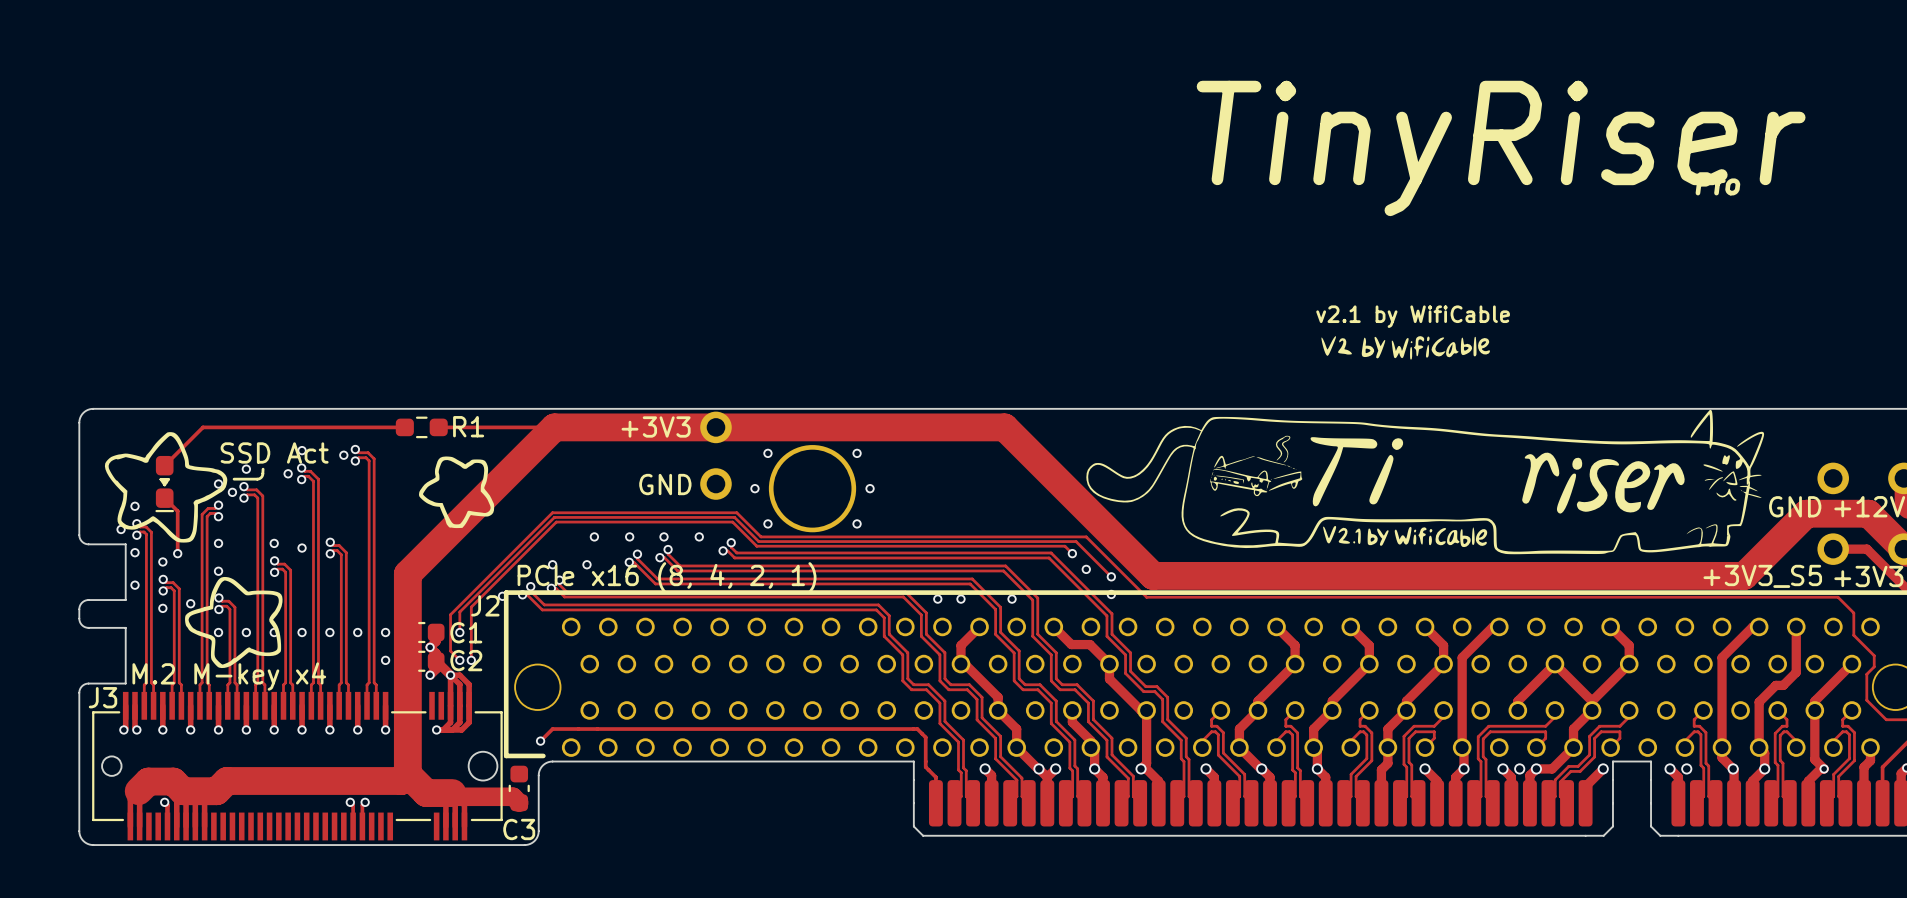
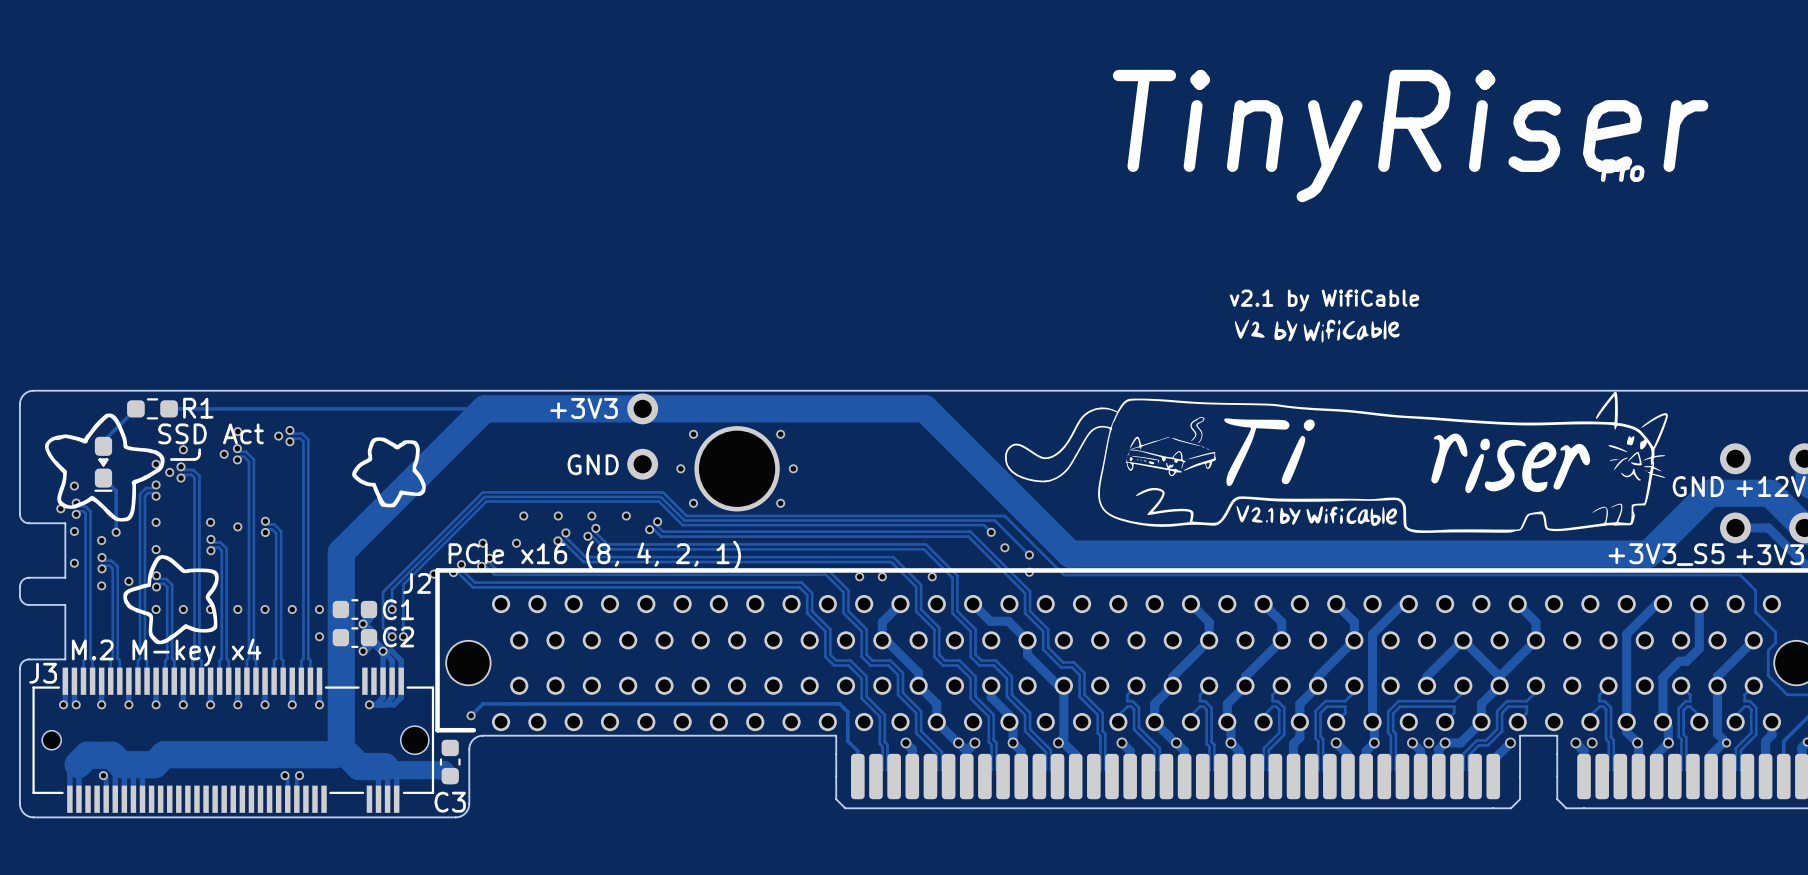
track: (231, 427) (202, 427) (164, 465) -> (135, 408) (103, 441) (103, 446)
track: none -> (338, 408) (371, 408)
R1 position: (421, 427) -> (152, 408)

